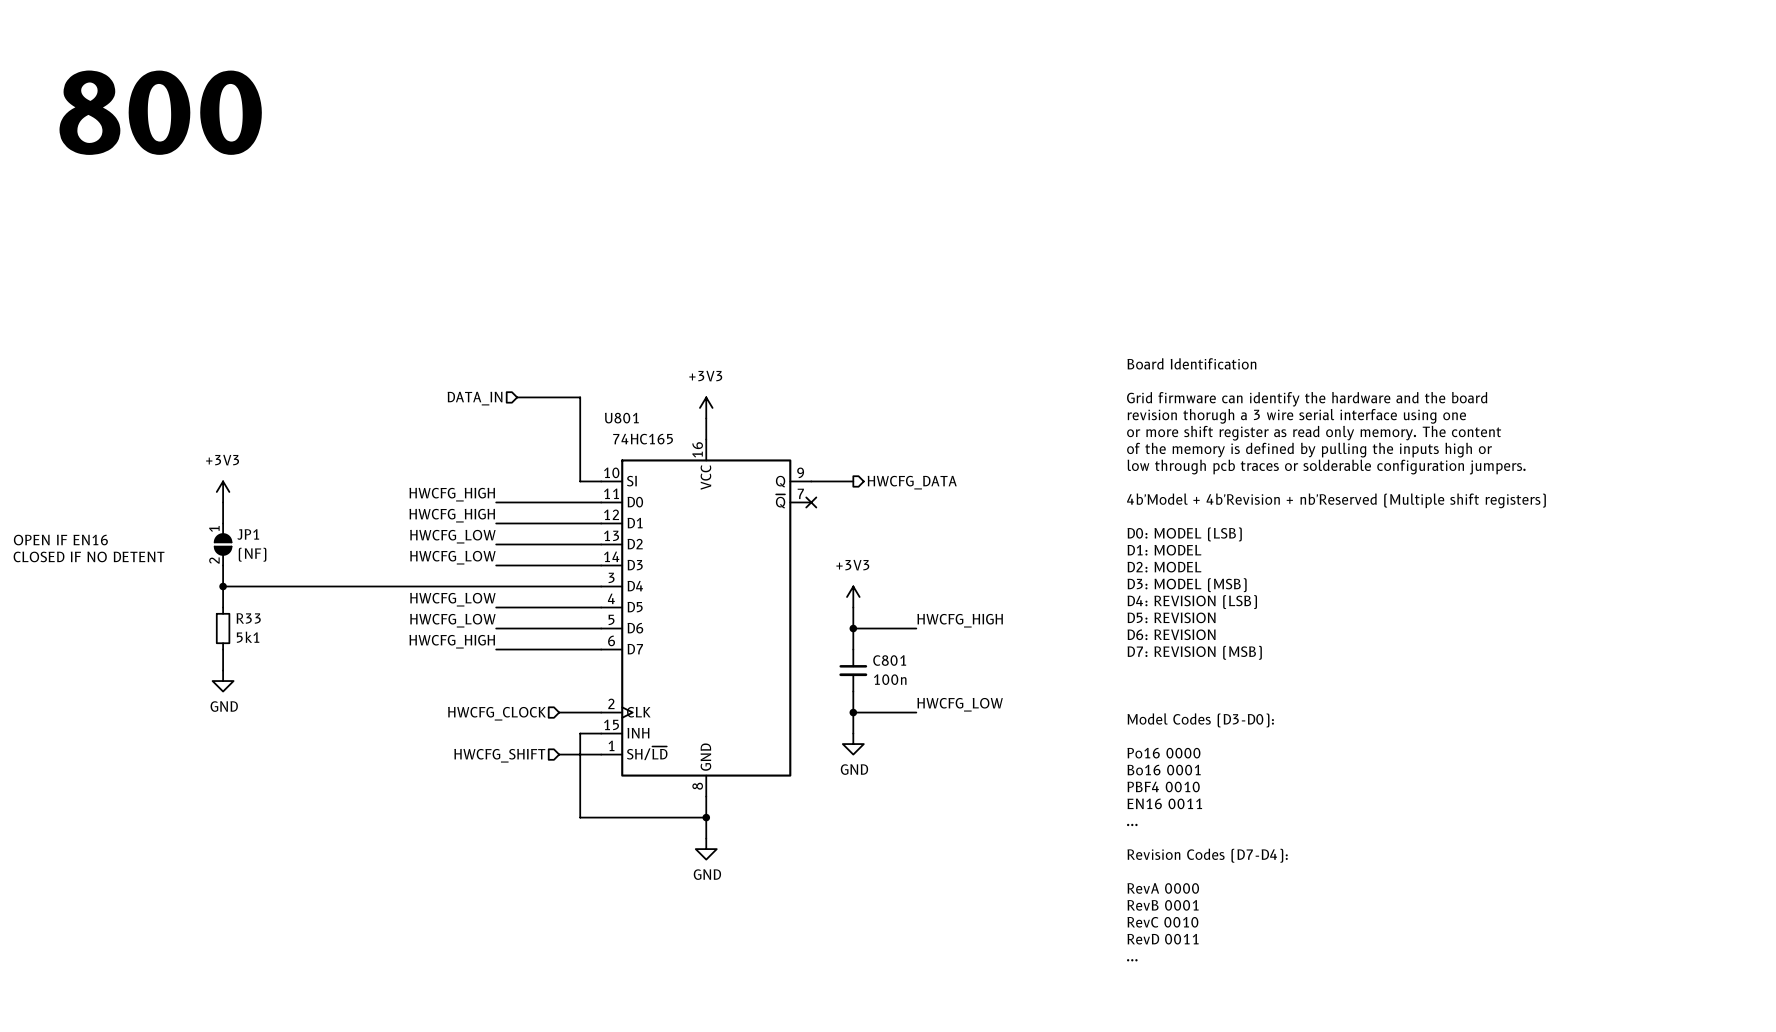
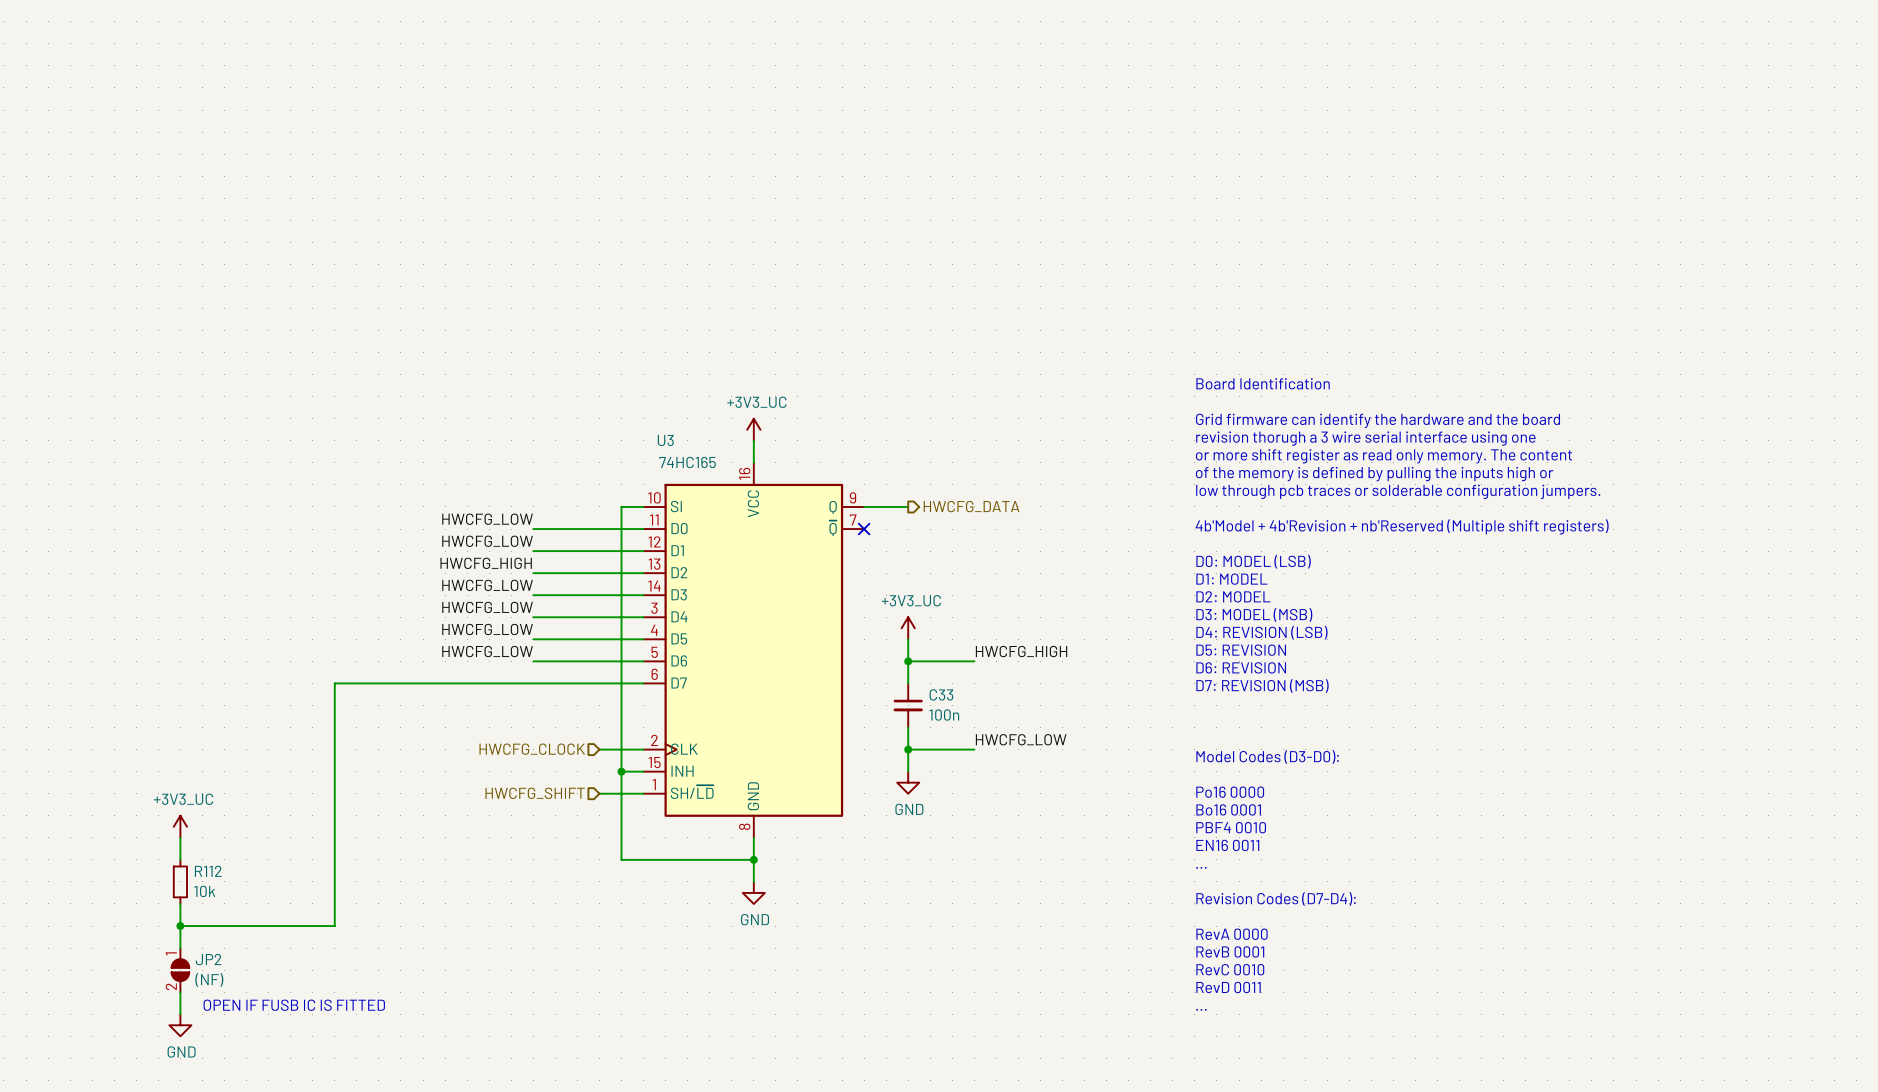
text: 800 (160, 112) -> none
wire: (517, 397) (580, 397) (580, 481) -> (621, 771) (621, 506)
hierarchical label: DATA_IN (475, 398) -> none
power symbol: +3V3 (706, 407) -> +3V3_UC (753, 429)
U801 name: U801 (621, 418) -> U3 (665, 440)
power symbol: +3V3 (223, 491) -> none
label: HWCFG_HIGH (452, 494) -> HWCFG_LOW (487, 519)
wire: (223, 502) (223, 523) -> none
label: HWCFG_HIGH (452, 515) -> HWCFG_LOW (487, 541)
label: HWCFG_LOW (452, 536) -> HWCFG_HIGH (486, 563)
text: OPEN IF EN16 (60, 540) -> none
JP1: (NF) (223, 544) -> none
text: CLOSED IF NO DETENT (89, 556) -> none
wire: (223, 565) (223, 607) -> none
label: none -> HWCFG_LOW (487, 607)
wire: (223, 586) (496, 586) -> none
junction: (223, 586) -> none
power symbol: +3V3 (853, 597) -> +3V3_UC (908, 628)
R33: 5k1 (223, 628) -> none
label: HWCFG_HIGH (452, 641) -> none
wire: (223, 649) (223, 670) -> (180, 837) (180, 859)
wire: none -> (533, 683) (334, 683) (334, 926) (180, 926)
C801 name: C801 (889, 660) -> C33 (941, 694)
power symbol: GND (223, 681) -> none
junction: none -> (621, 771)
power symbol: none -> +3V3_UC (180, 826)
R112: none -> 10k (180, 881)
wire: none -> (180, 903) (180, 948)
junction: none -> (180, 926)
JP2: none -> (NF) (180, 970)
wire: none -> (180, 992) (180, 1014)
text: none -> OPEN IF FUSB IC IS FITTED (294, 1005)
power symbol: none -> GND (180, 1025)

